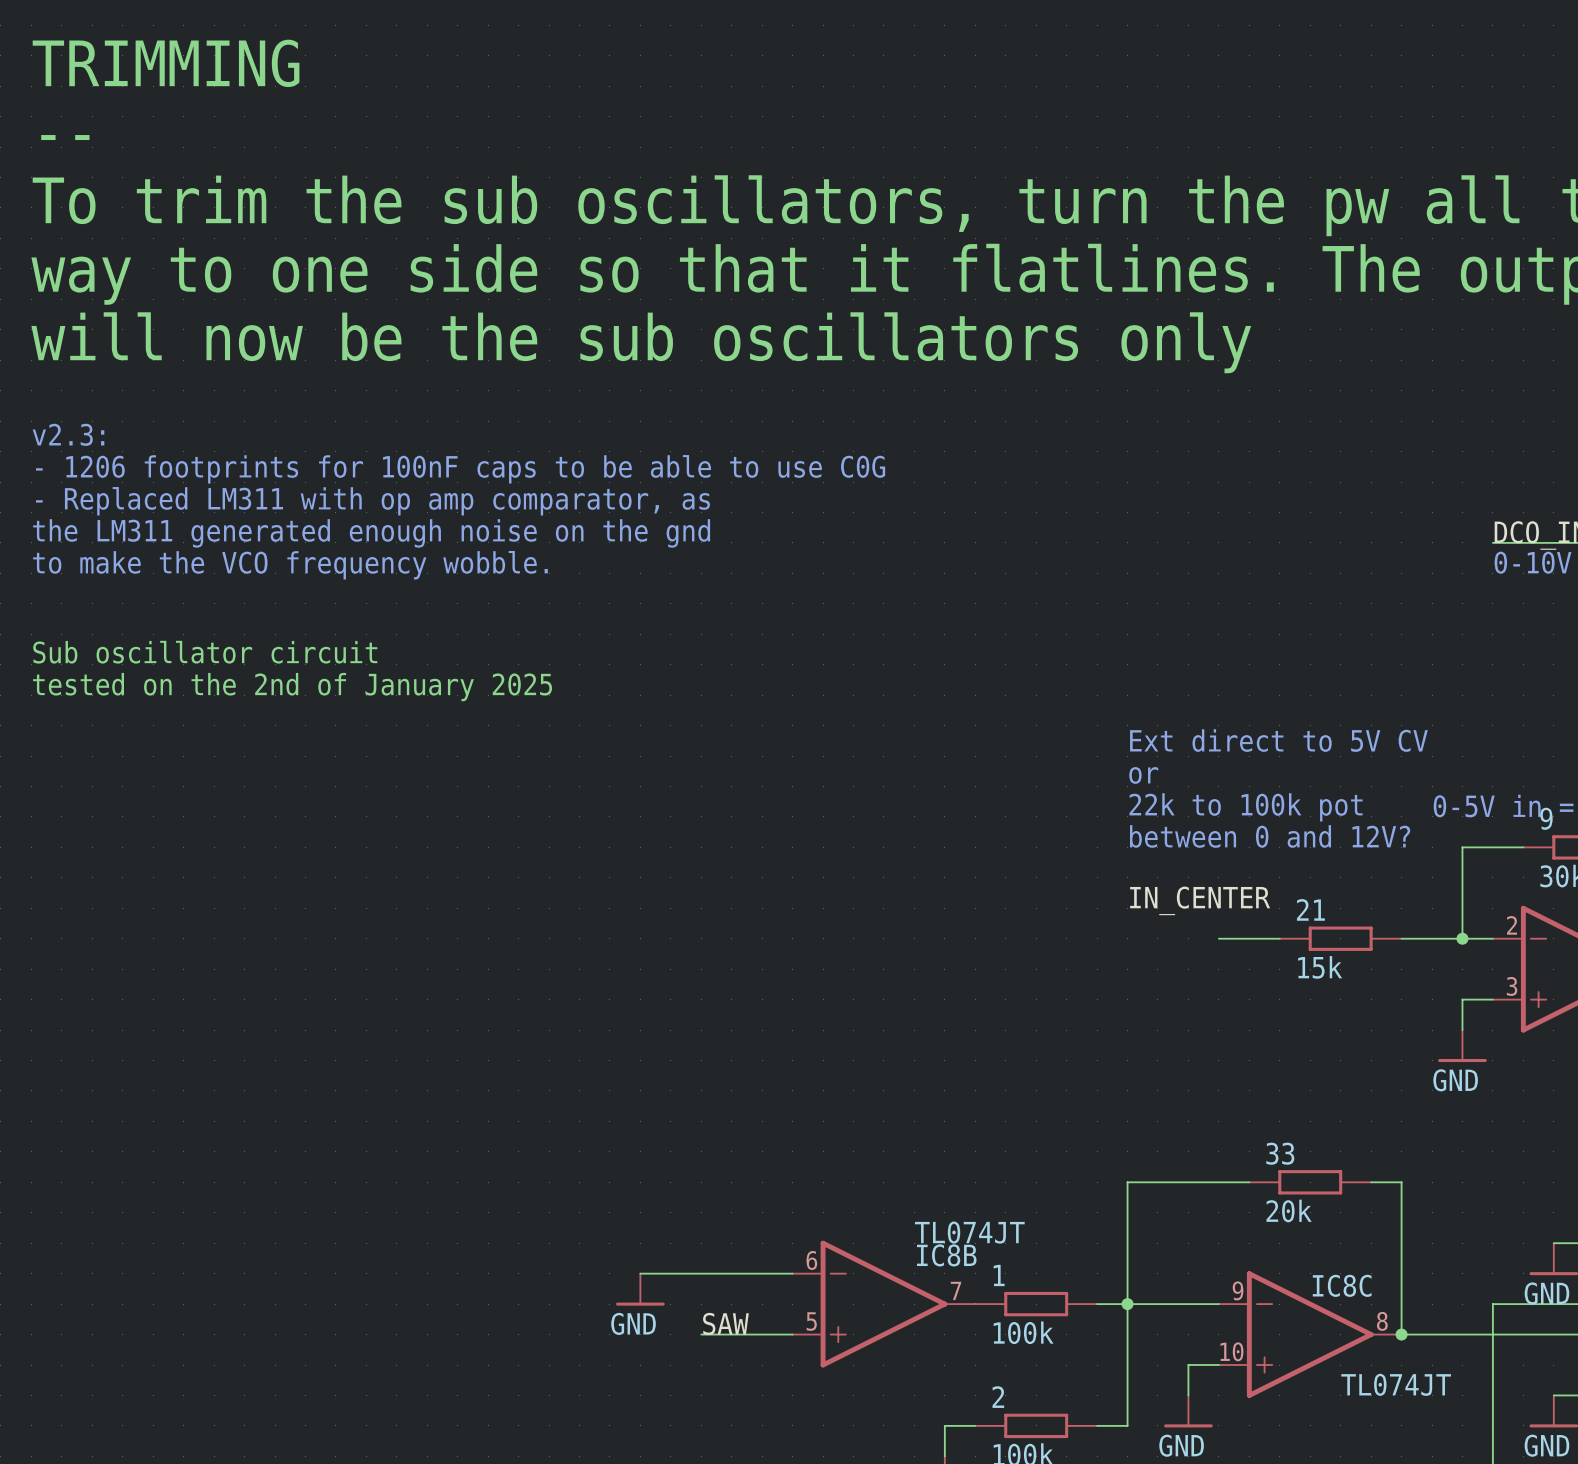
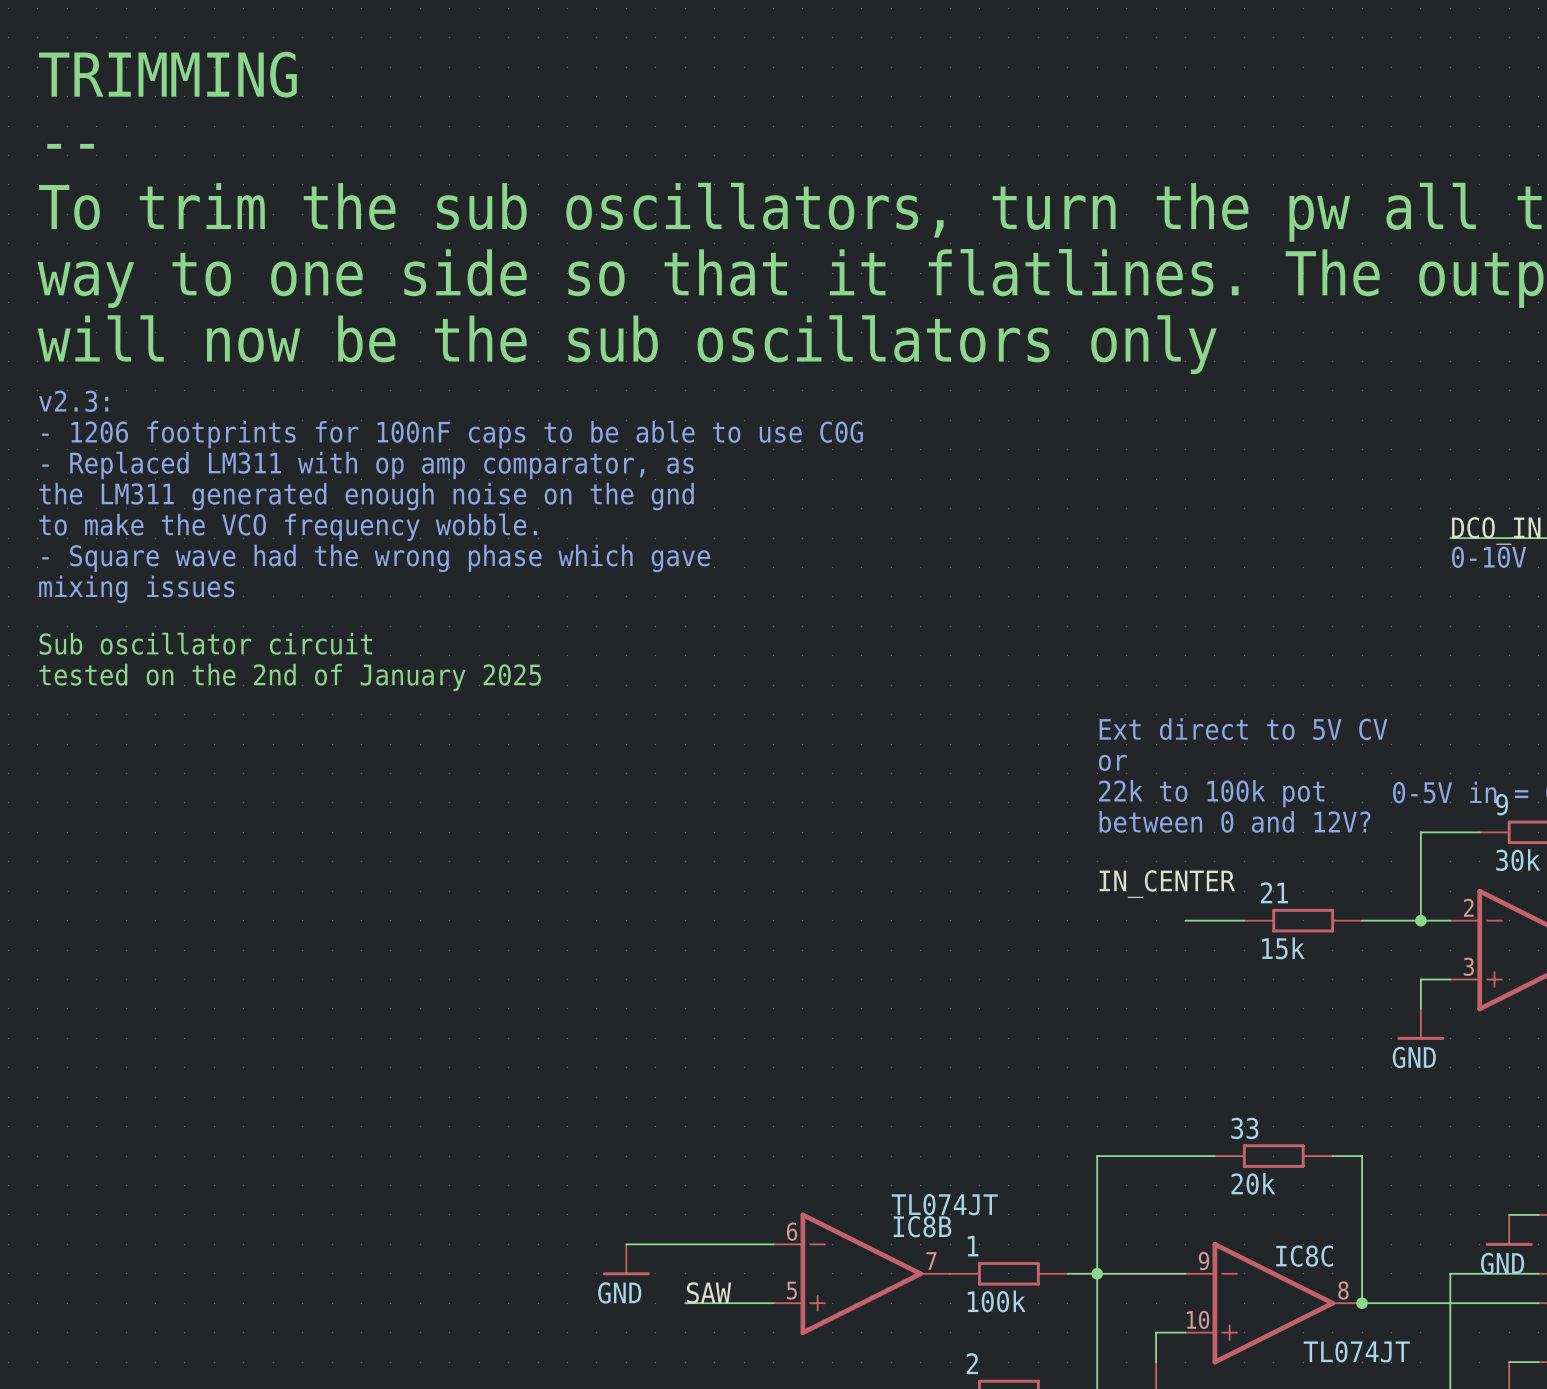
text: none -> v2.3: (73, 401)
text: v2.3: (68, 434) -> - 1206 footprints for 100nF caps to be able to use C0G (452, 434)
text: - 1206 footprints for 100nF caps to be able to use C0G (460, 469) -> - Replaced LM311 with op amp comparator, as (367, 465)
text: - Replaced LM311 with op amp comparator, as (372, 501) -> the LM311 generated enough noise on the gnd (366, 496)
text: the LM311 generated enough noise on the gnd (371, 533) -> to make the VCO frequency wobble. (288, 527)
text: to make the VCO frequency wobble. (290, 565) -> - Square wave had the wrong phase which gave (376, 558)
text: none -> mixing issues (136, 589)

